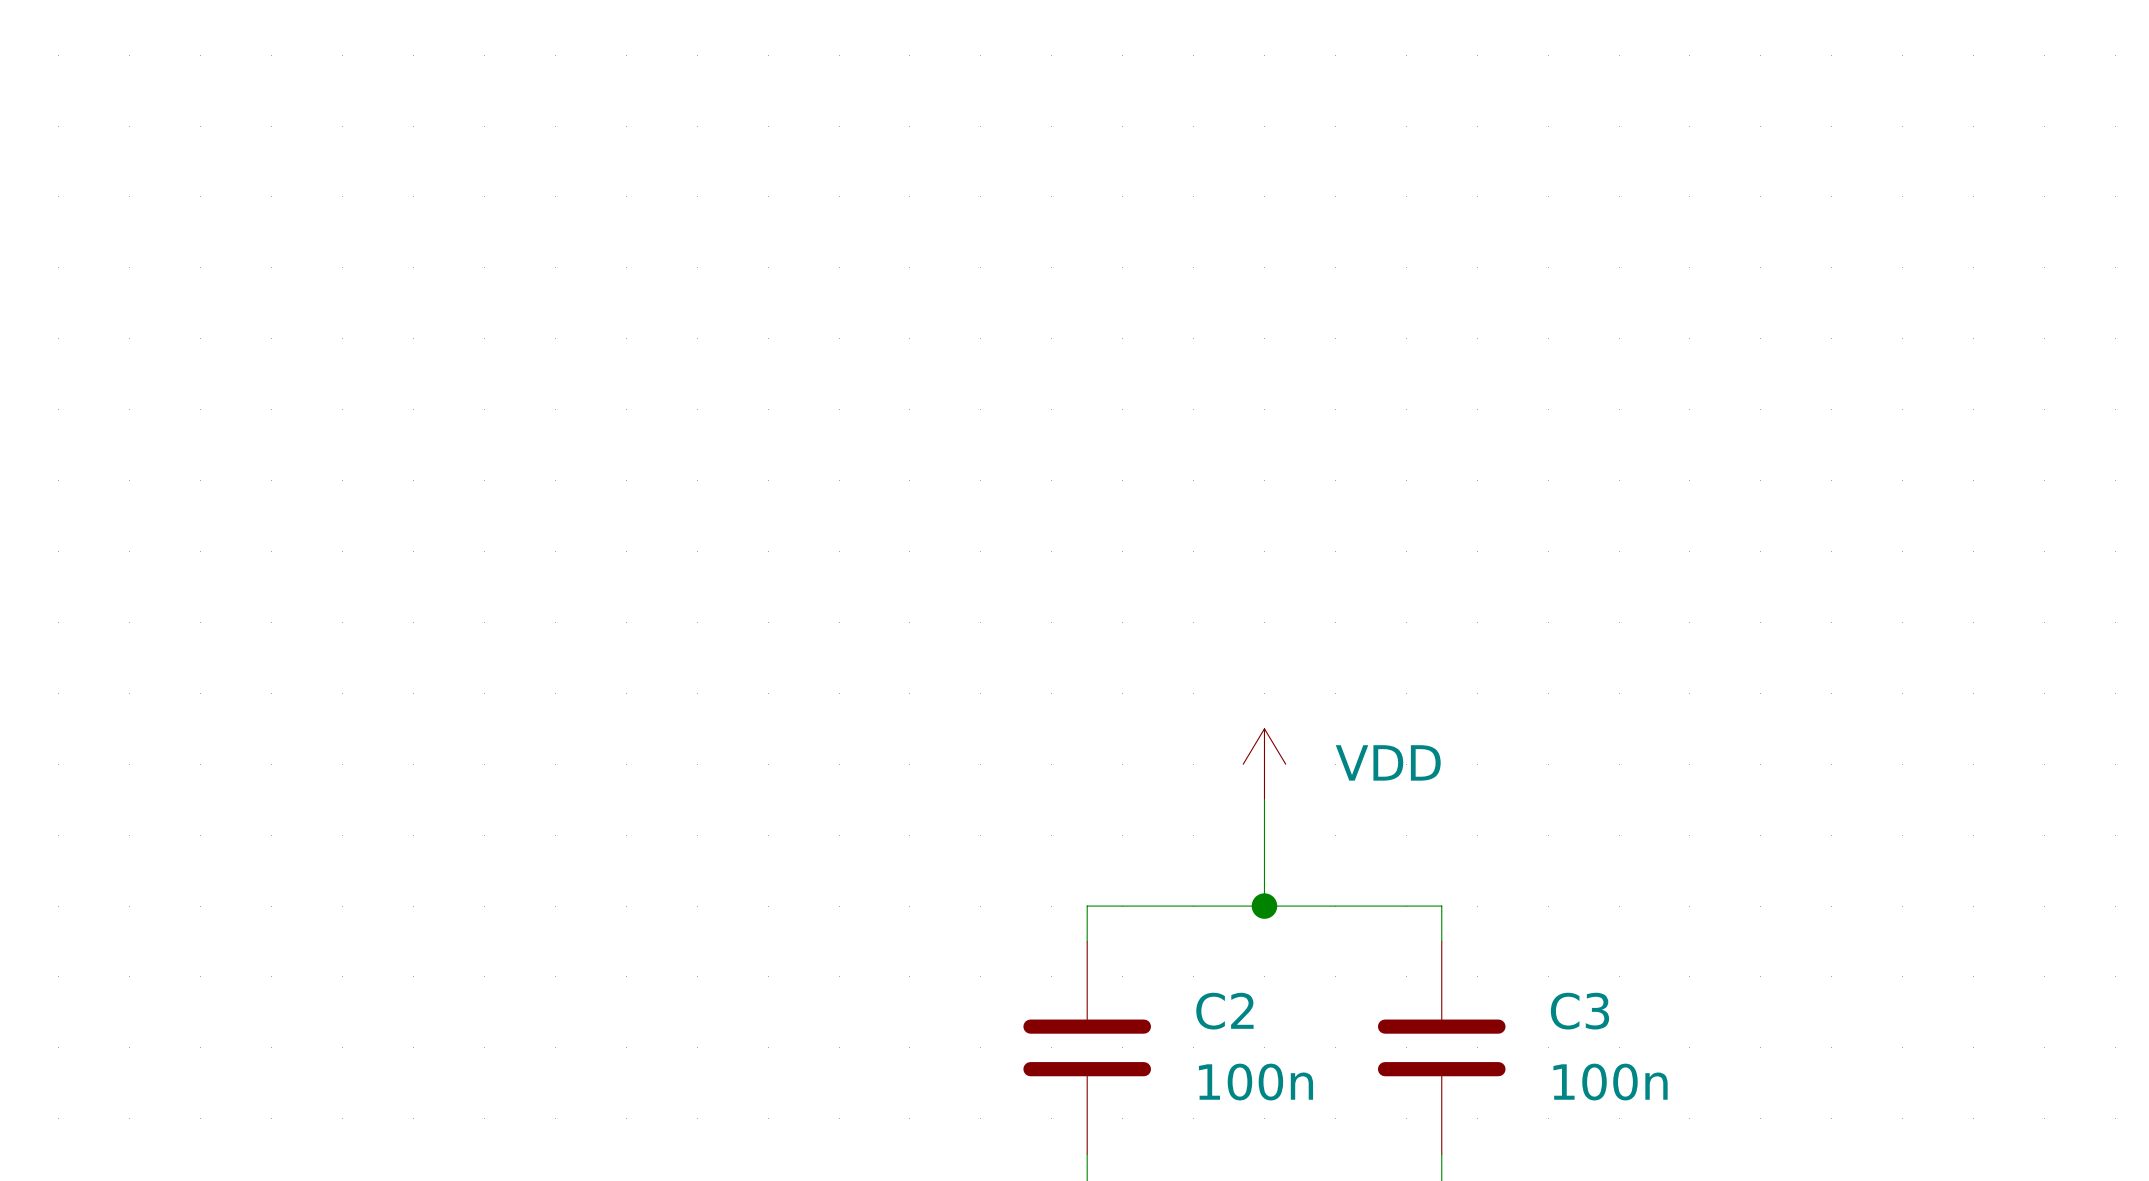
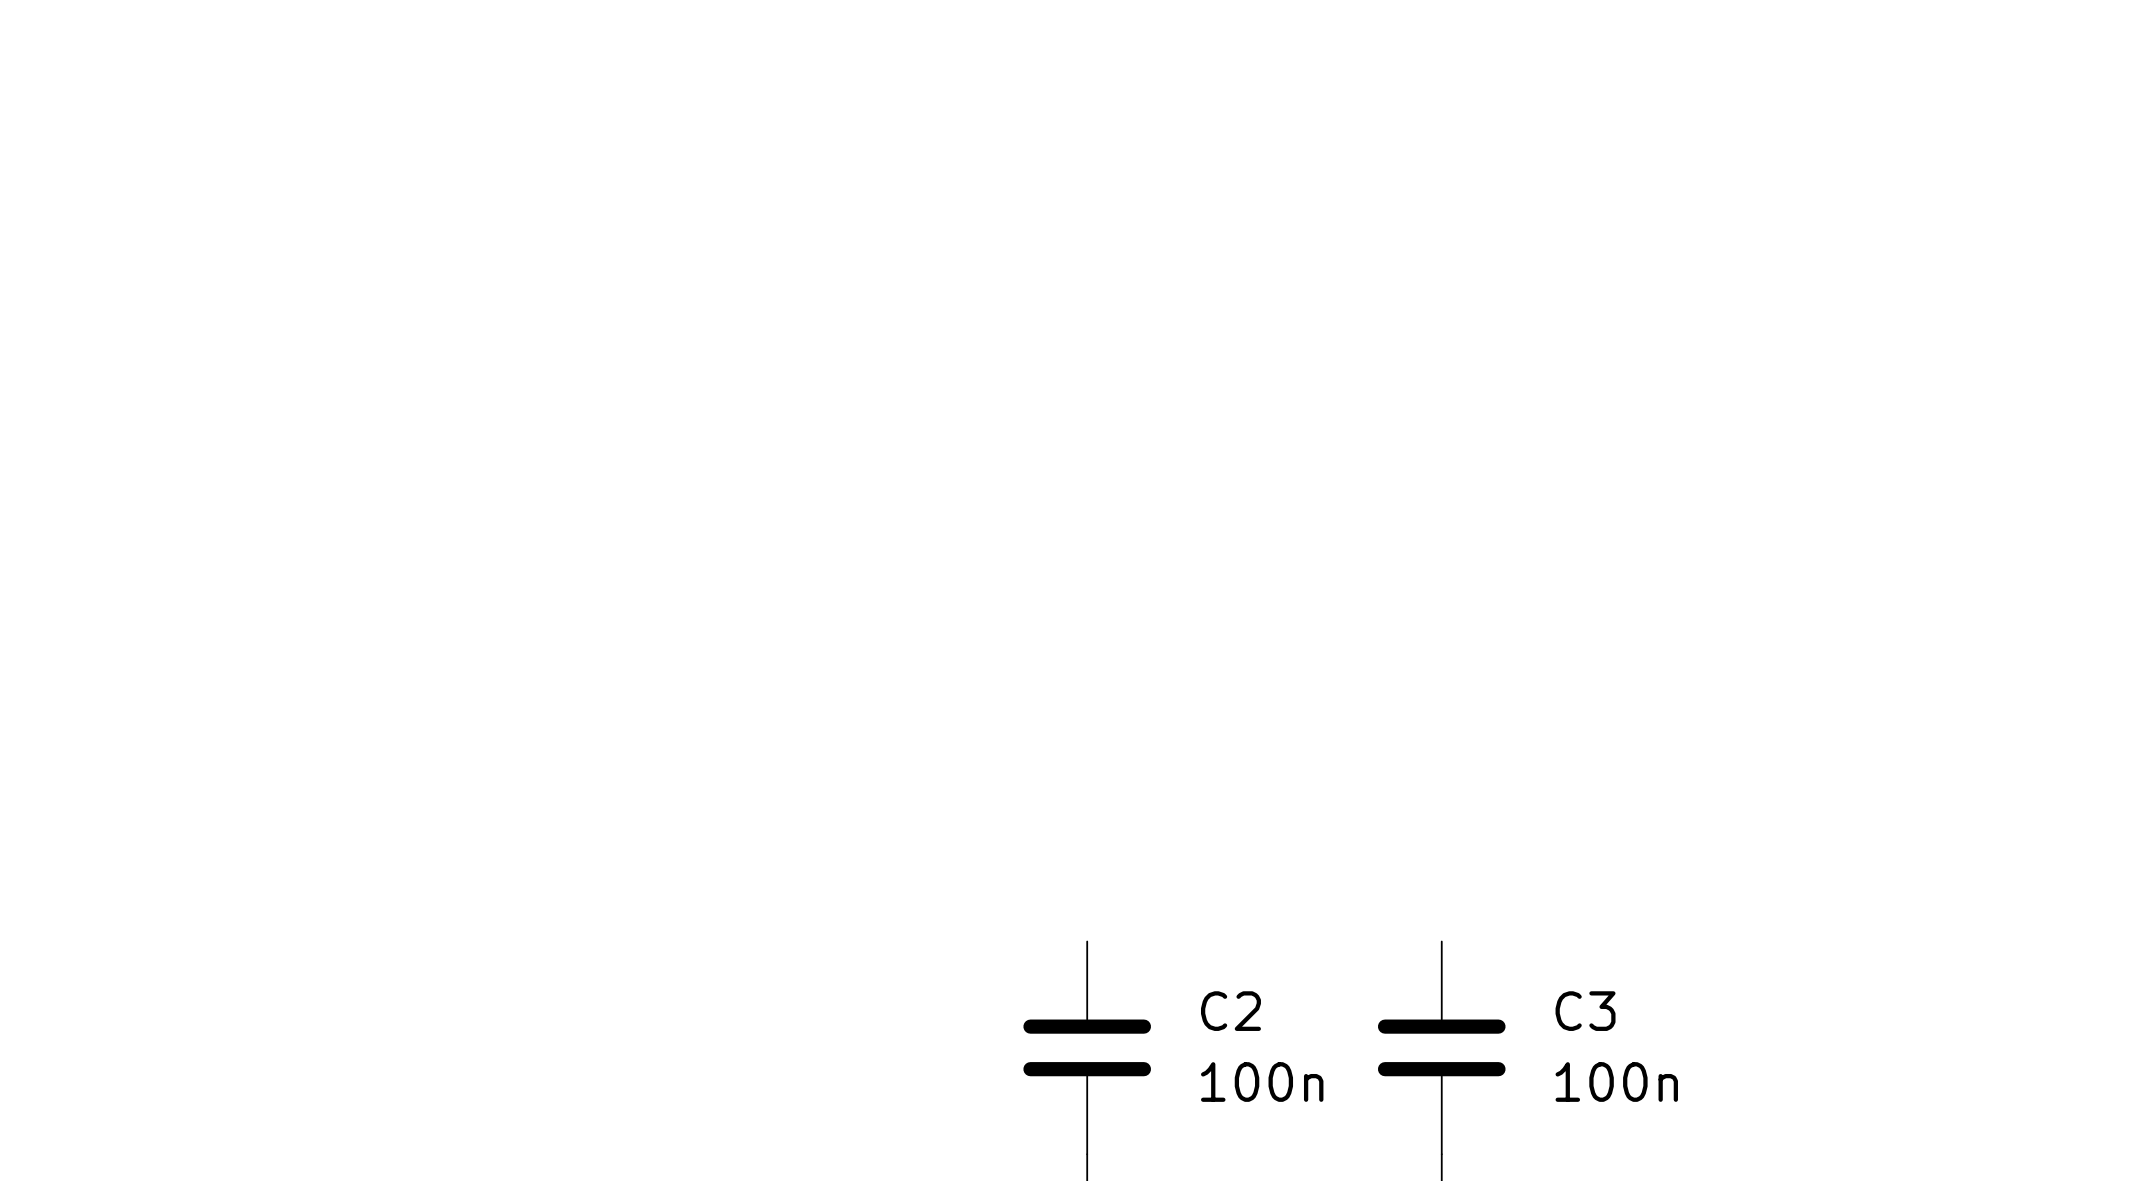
power symbol: VDD (1264, 764) -> none
wire: (1264, 799) (1264, 906) -> none
junction: (1264, 906) -> none
wire: (1087, 941) (1087, 906) (1441, 906) (1441, 941) -> none

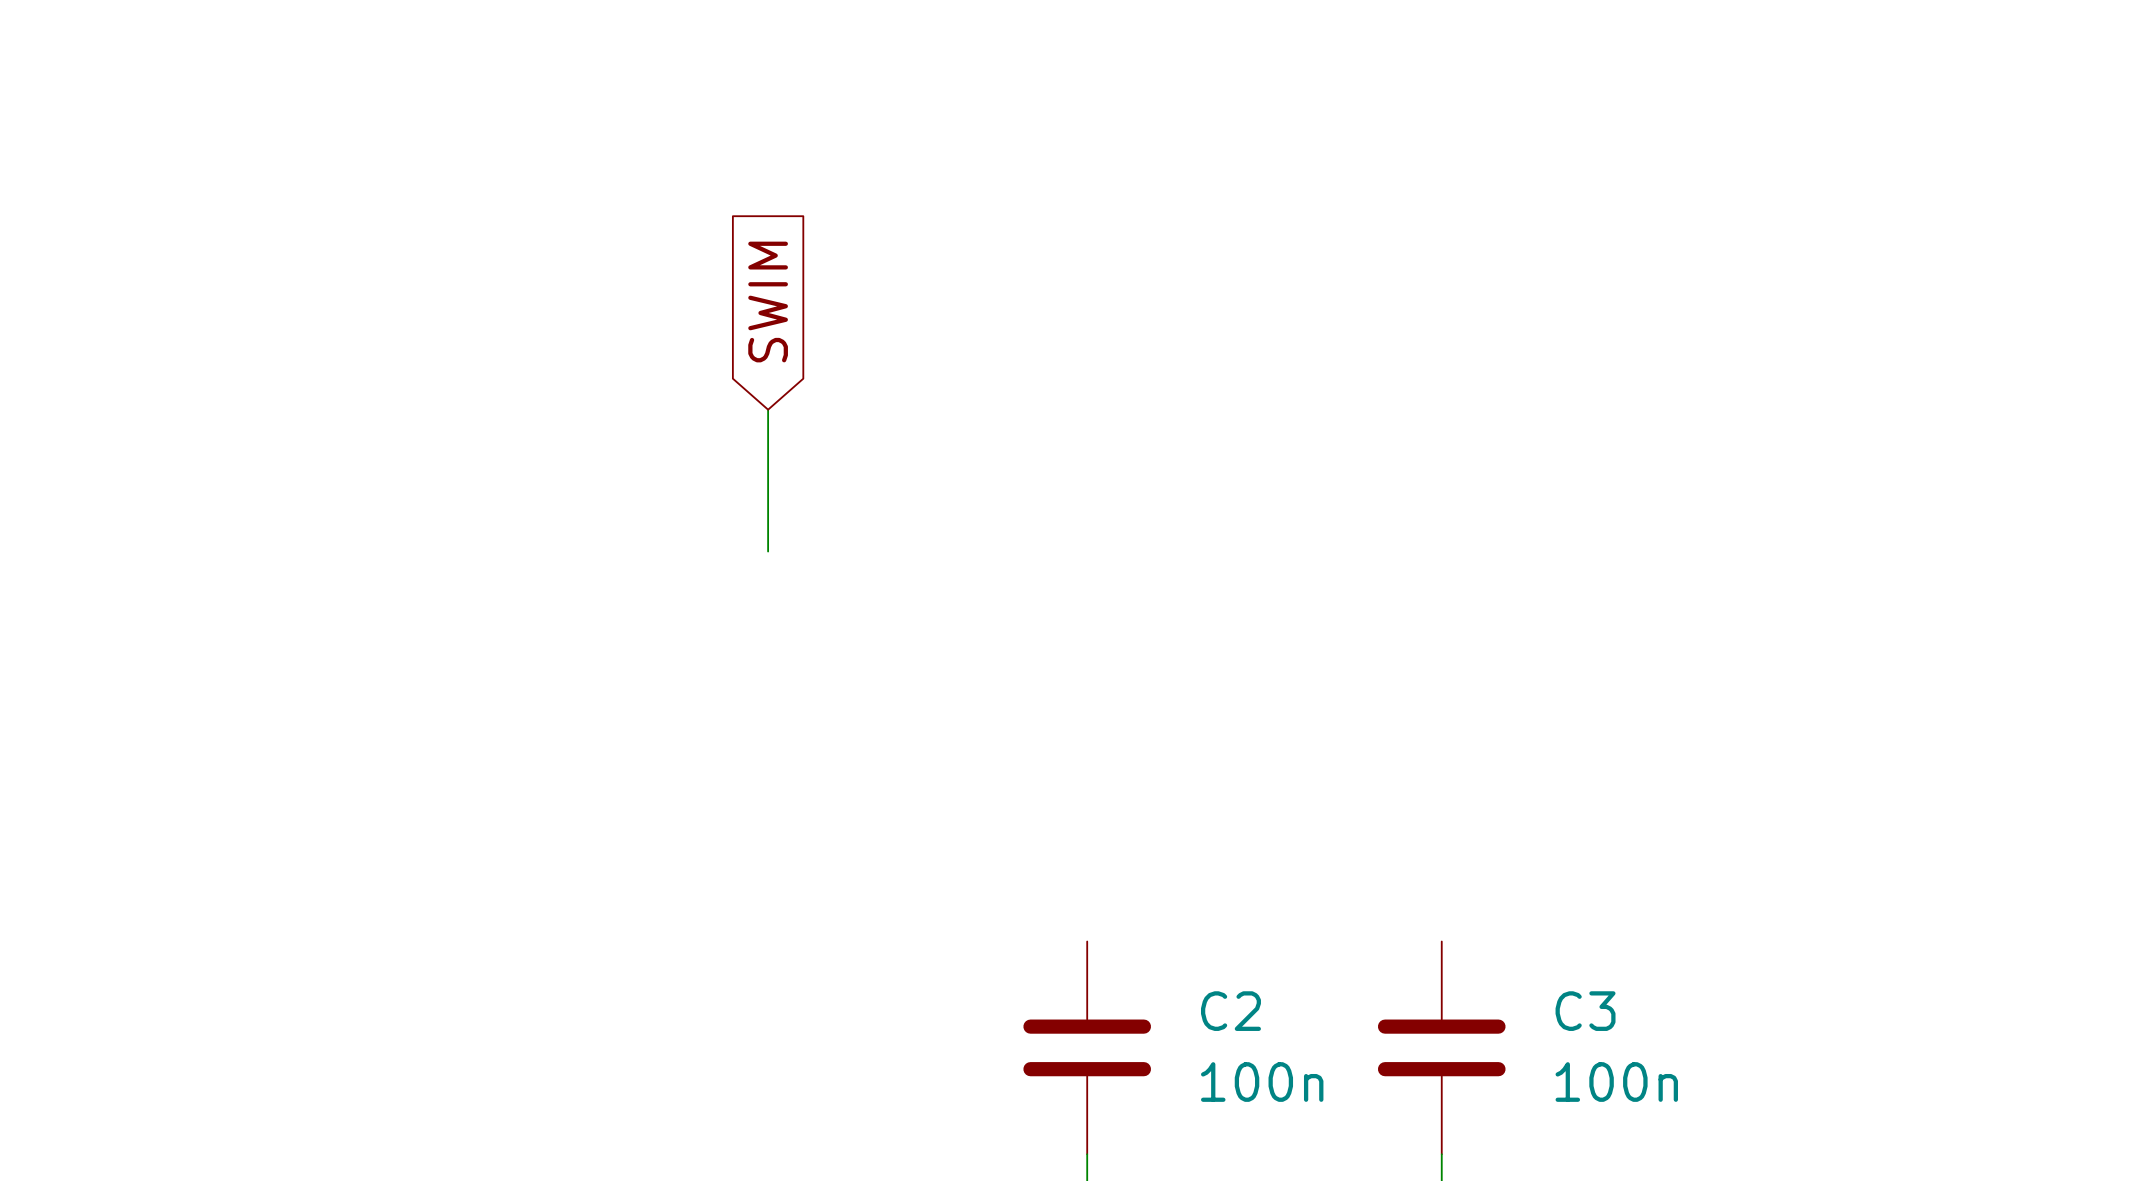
global label: none -> SWIM (768, 302)
wire: none -> (768, 409) (768, 551)

